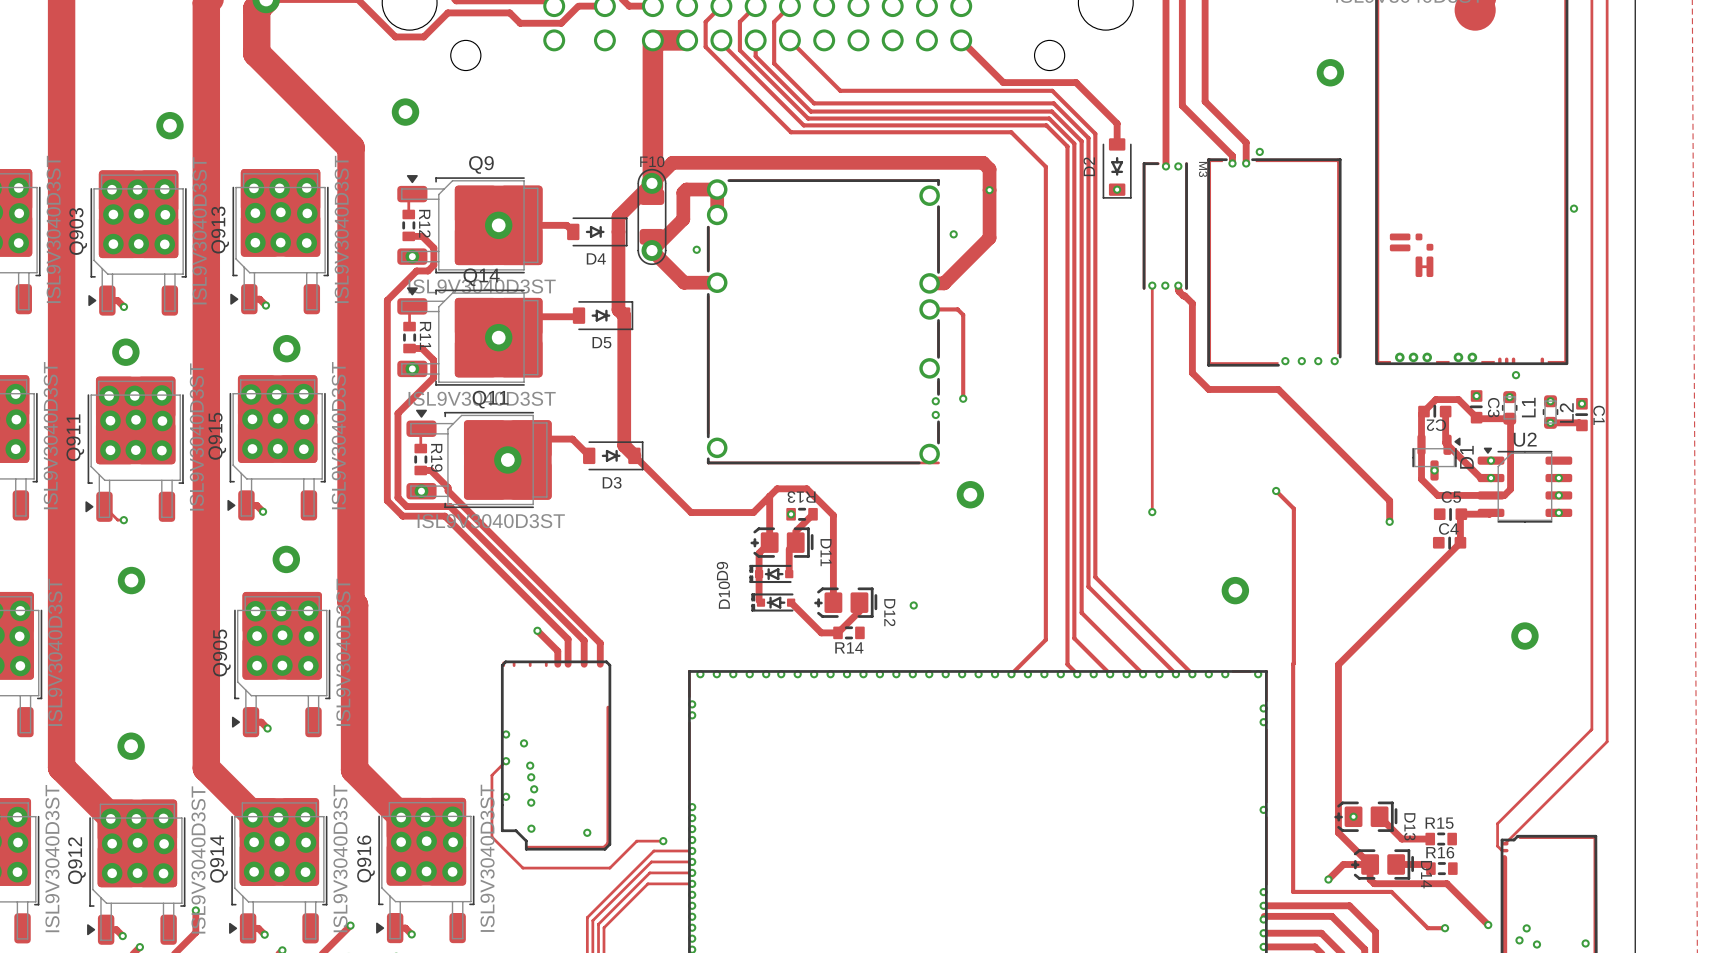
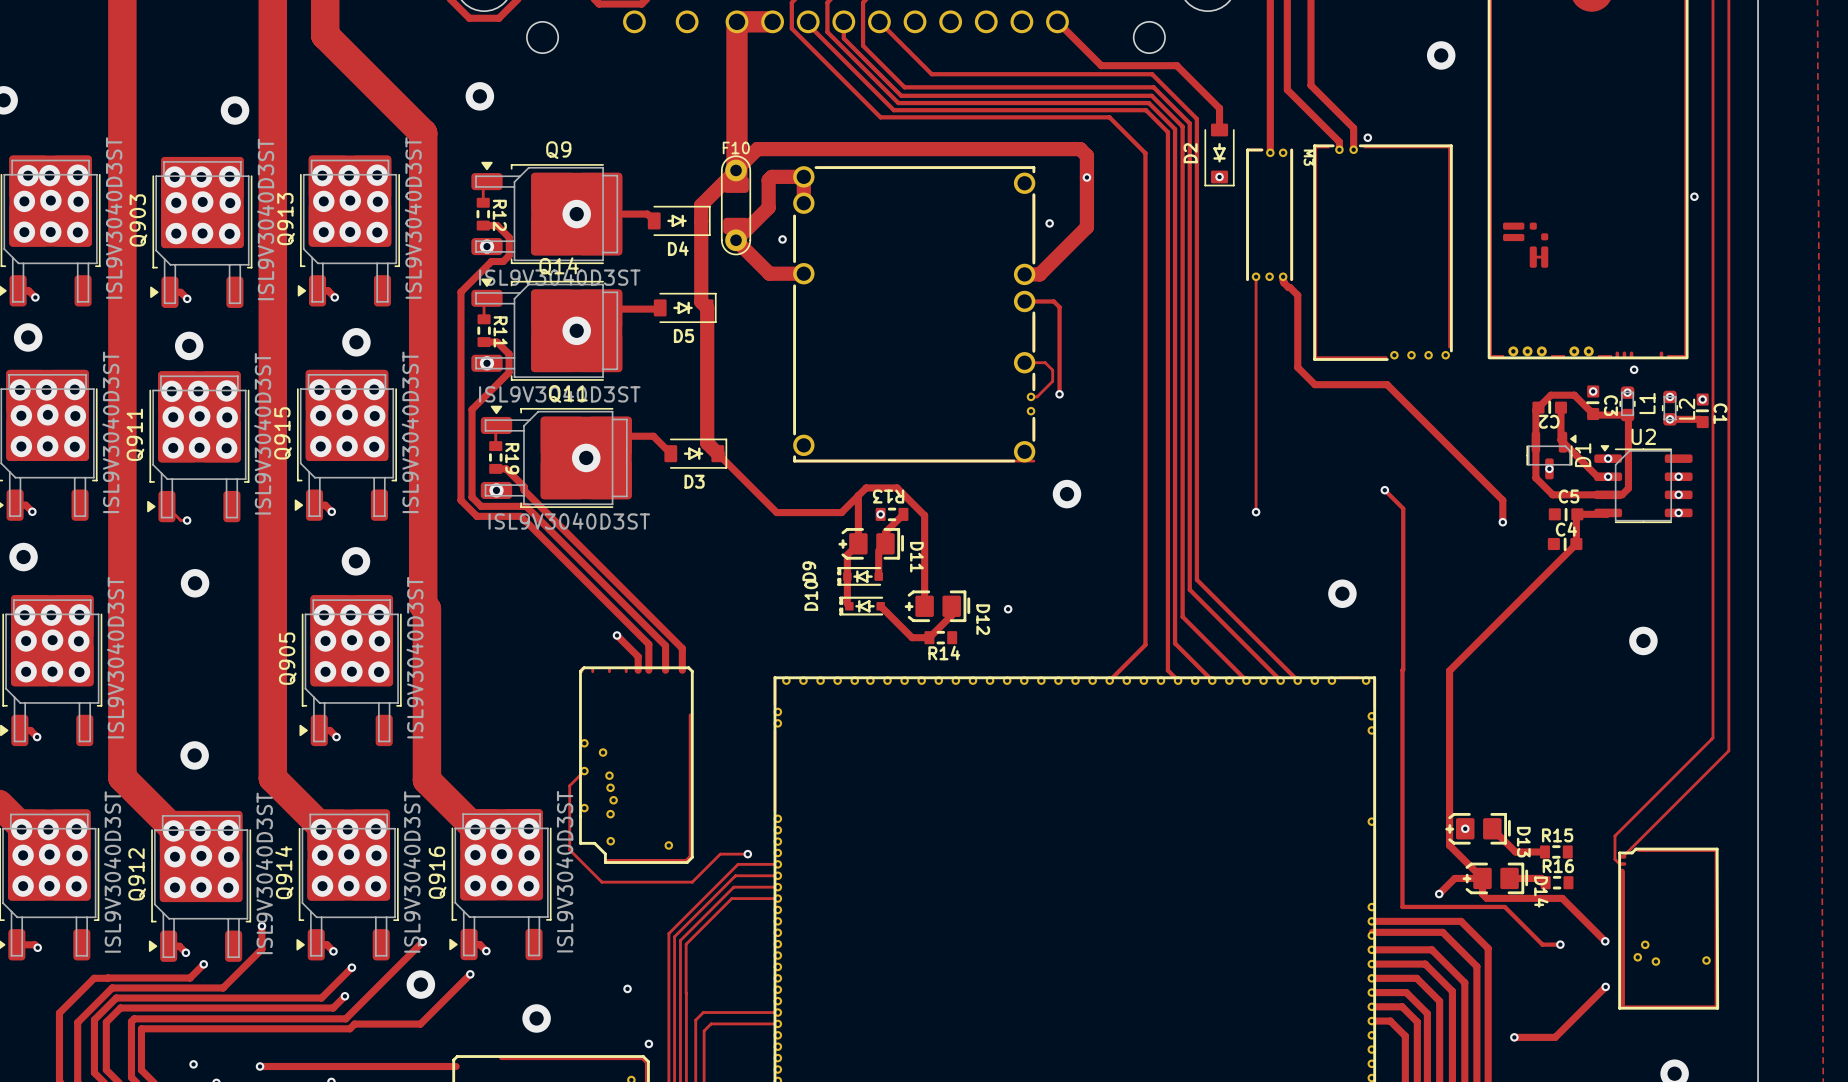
track: none -> (1024, 362) (1045, 362) (1052, 370) (1052, 381) (1037, 396) (1031, 396)

